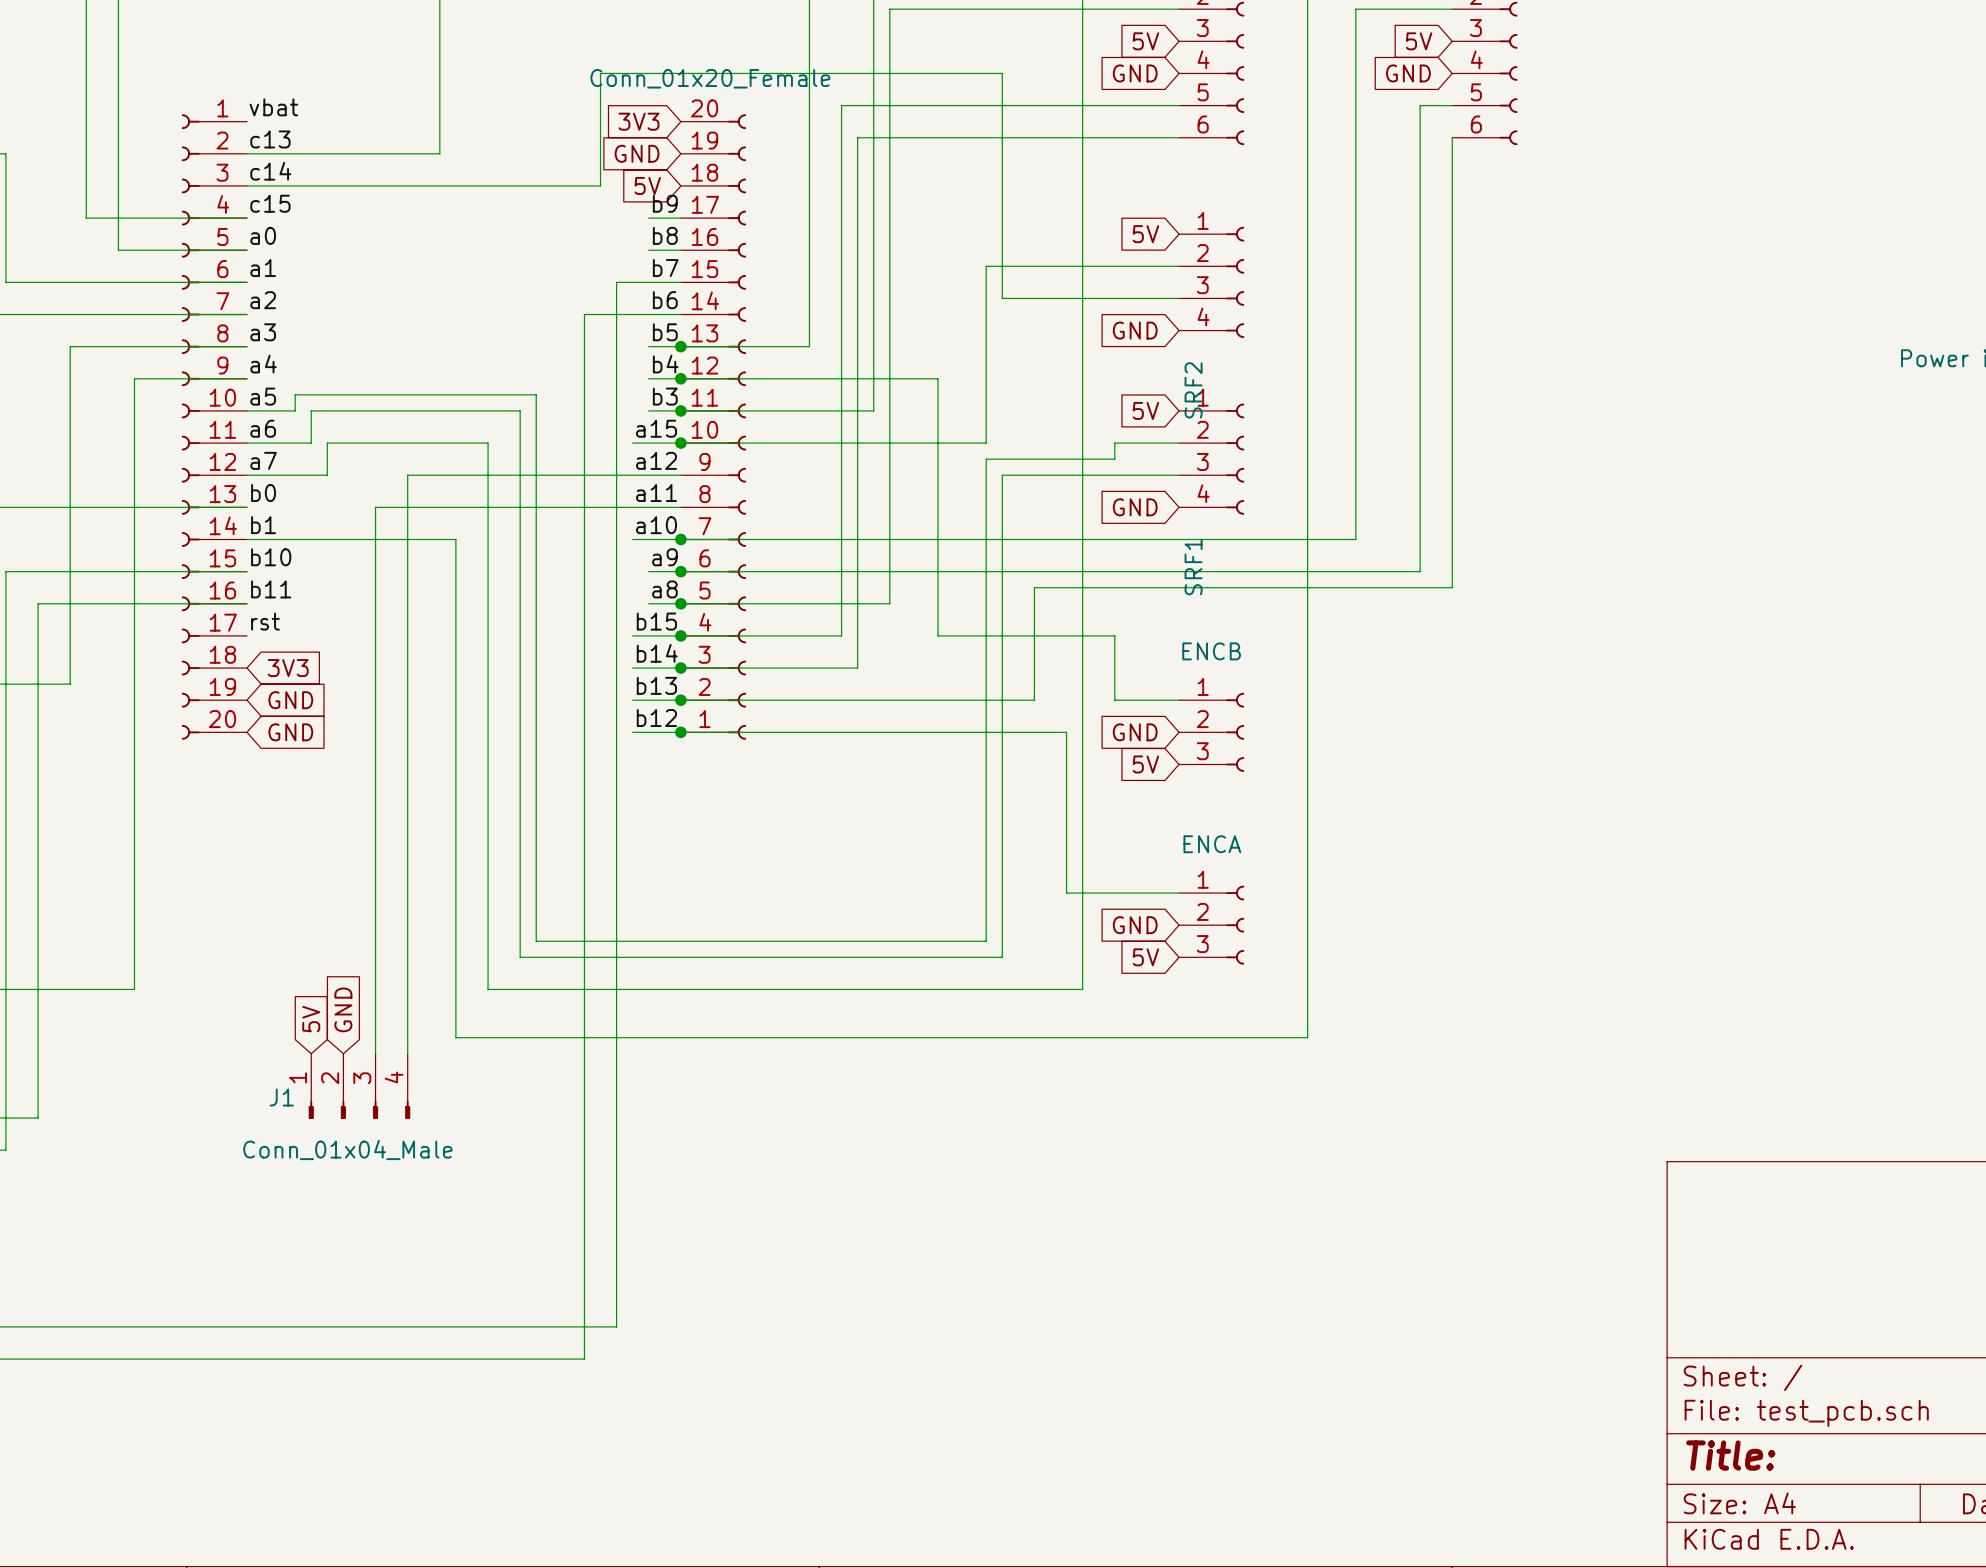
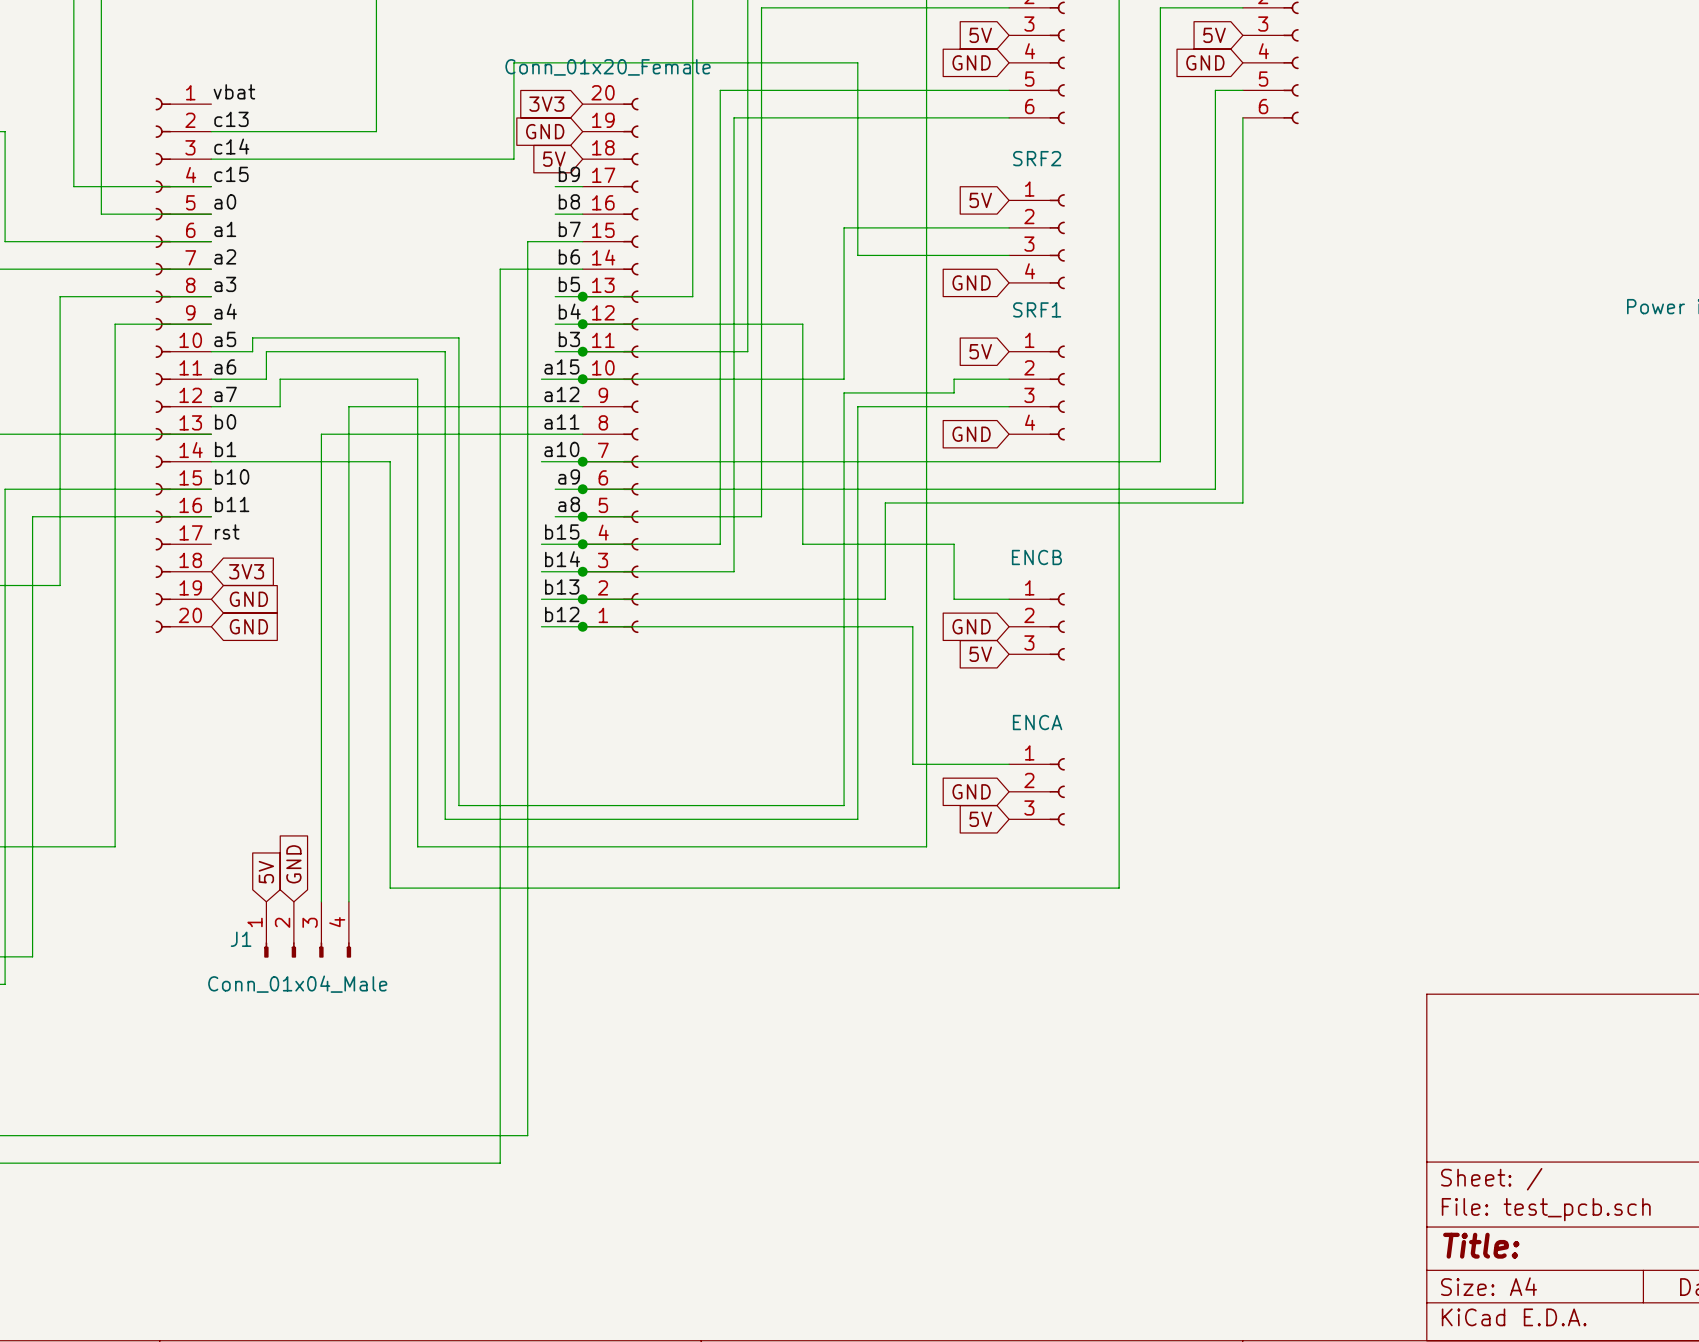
SRF2 name: none -> SRF2 (1037, 158)
SRF1 name: none -> SRF1 (1037, 309)
SRF2 value: SRF2 (1193, 390) -> none
SRF1 value: SRF1 (1193, 567) -> none

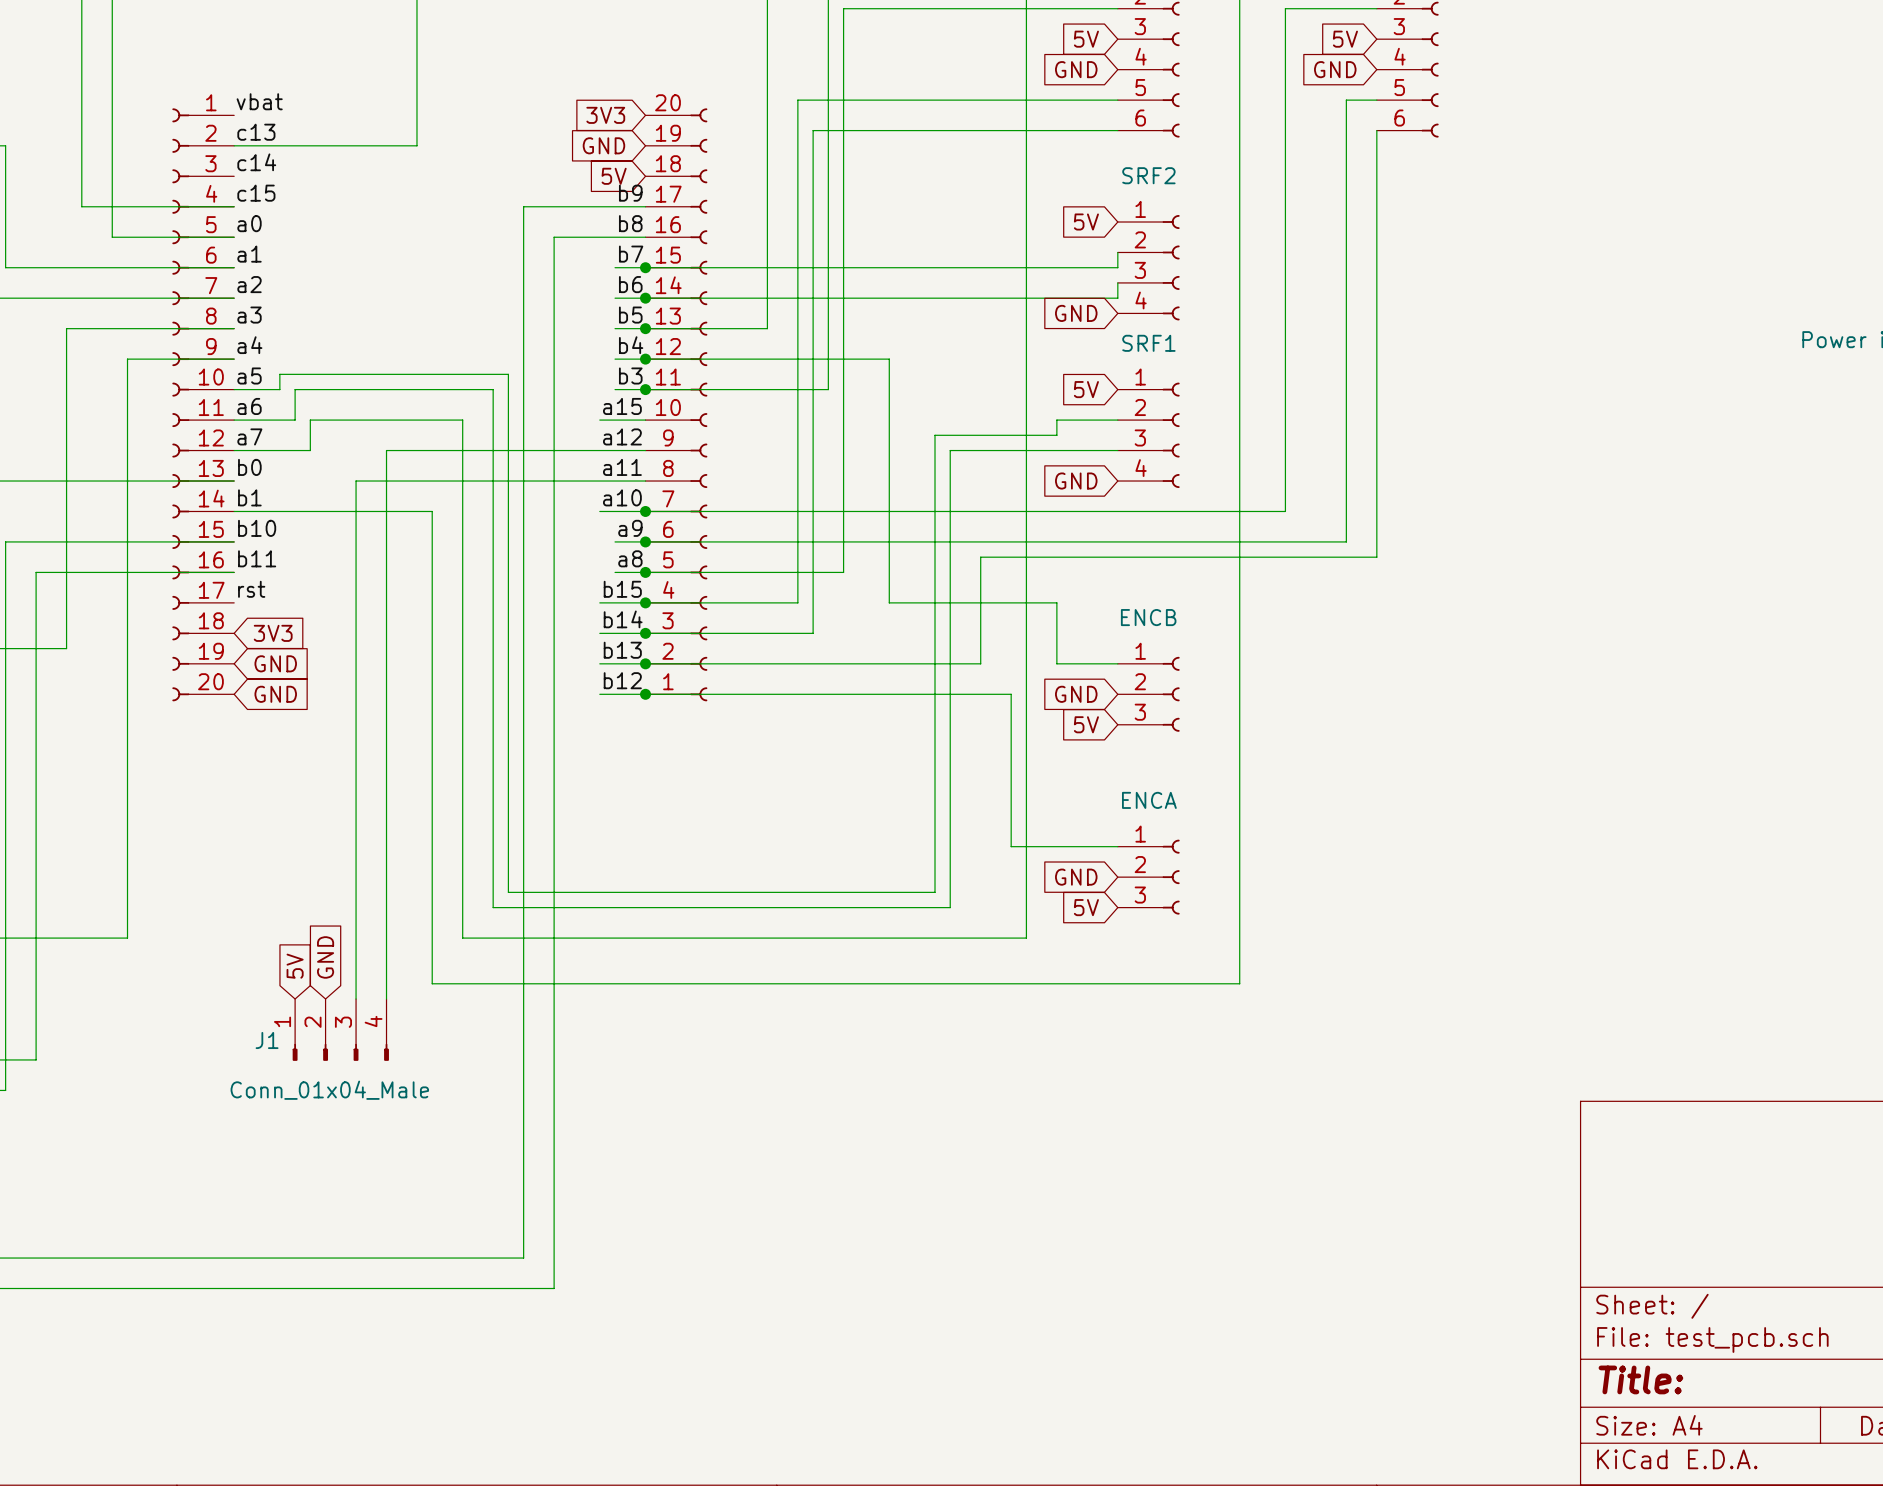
part value: Conn_01x20_Female (608, 67) -> none
wire: (211, 159) (513, 159) (513, 62) (857, 62) (857, 255) (1009, 255) -> (645, 298) (1117, 298) (1117, 282)
wire: (1009, 227) (844, 227) (844, 379) (582, 379) -> (1117, 252) (1117, 267) (645, 267)
wire: (555, 241) (527, 241) (527, 1135) (472, 1135) -> (615, 206) (523, 206) (523, 1258)
junction: none -> (645, 267)
wire: (500, 269) (555, 269) -> (554, 298) (554, 237) (615, 237)
junction: none -> (645, 298)
junction: (582, 379) -> none

